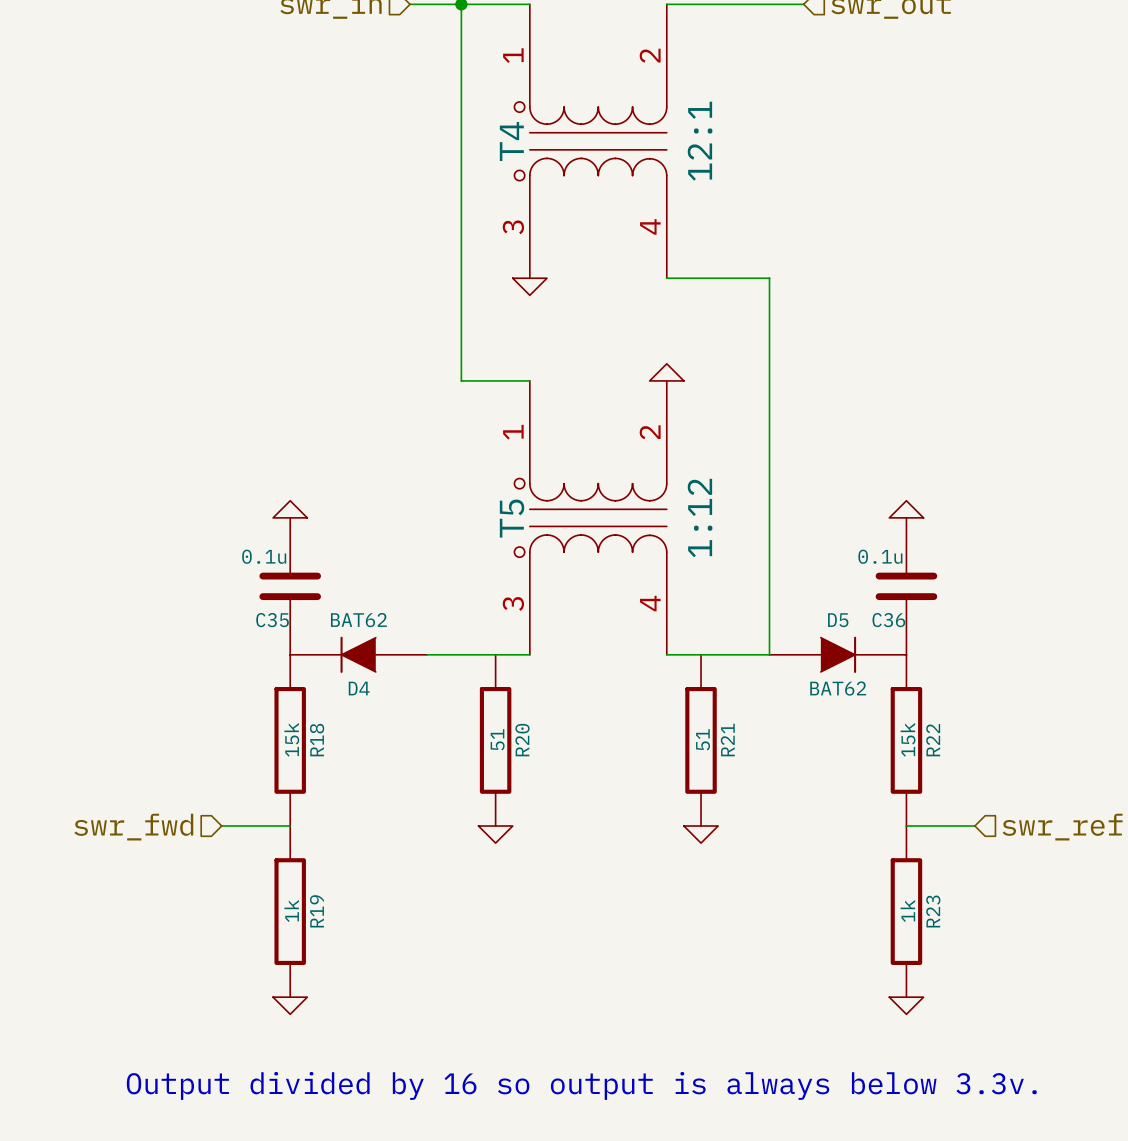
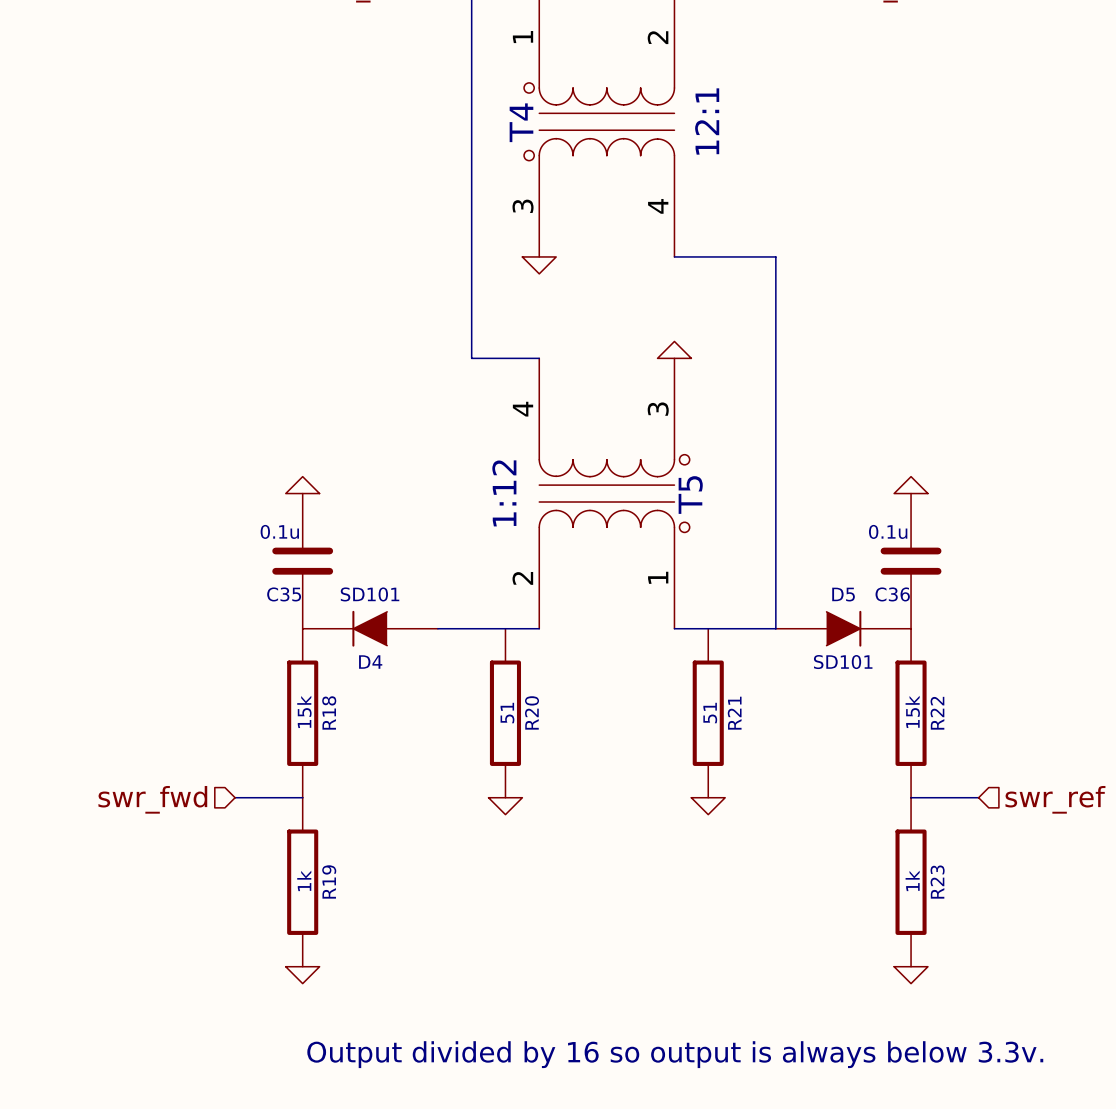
T5 rotation: 0° (590, 517) -> 180° (614, 493)
D4 value: BAT62 (358, 620) -> SD101 (370, 594)
D5 value: BAT62 (838, 688) -> SD101 (843, 662)

